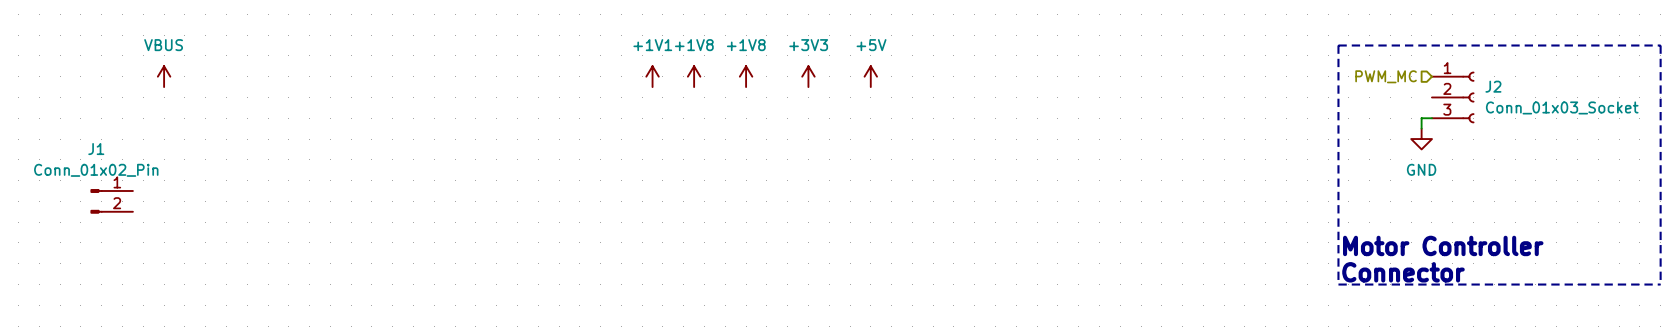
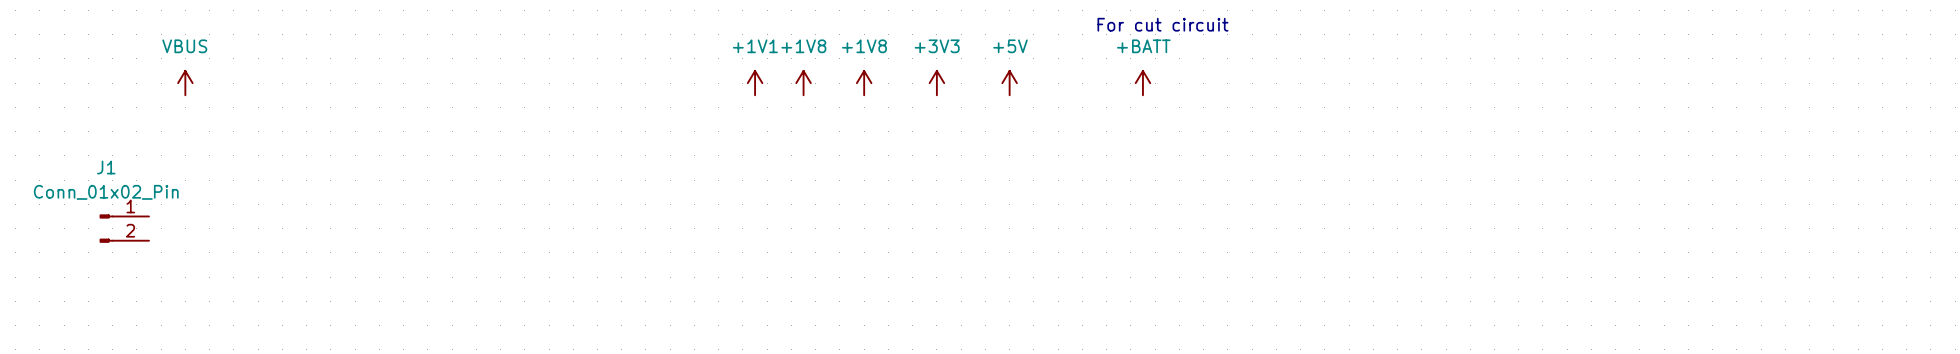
text: none -> For cut circuit (1162, 24)
line: (1338, 45) (1660, 45) (1660, 284) (1338, 284) (1338, 45) -> none
power symbol: none -> +BATT (1142, 83)
hierarchical label: PWM_MC (1386, 76) -> none
J2: Conn_01x03_Socket (1453, 97) -> none
wire: (1431, 118) (1421, 118) (1421, 128) -> none
power symbol: GND (1421, 139) -> none
text: Motor Controller (1443, 245) -> none
text: Connector (1403, 272) -> none

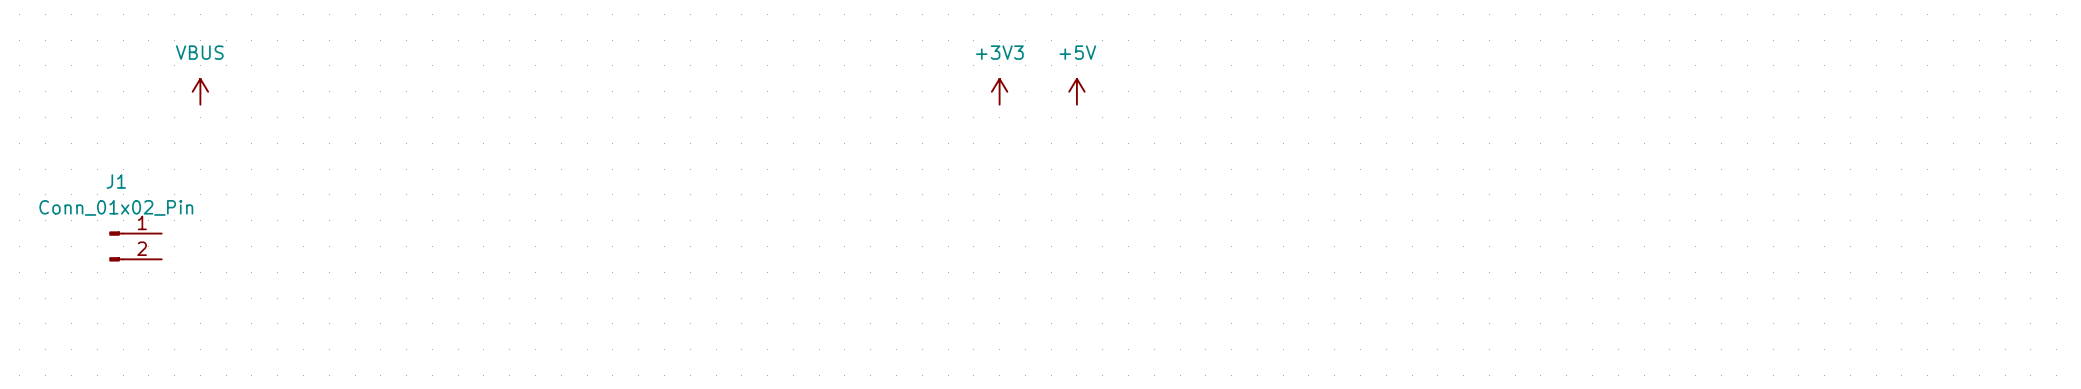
text: For cut circuit (1162, 24) -> none
power symbol: +1V1 (755, 83) -> none
power symbol: +1V8 (803, 83) -> none
power symbol: +1V8 (864, 83) -> none
power symbol: +BATT (1142, 83) -> none

